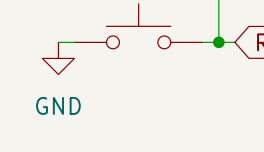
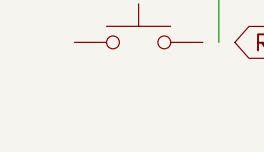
wire: (58, 42) (74, 42) -> none
wire: (202, 42) (234, 42) -> none
junction: (218, 42) -> none
power symbol: GND (58, 58) -> none

